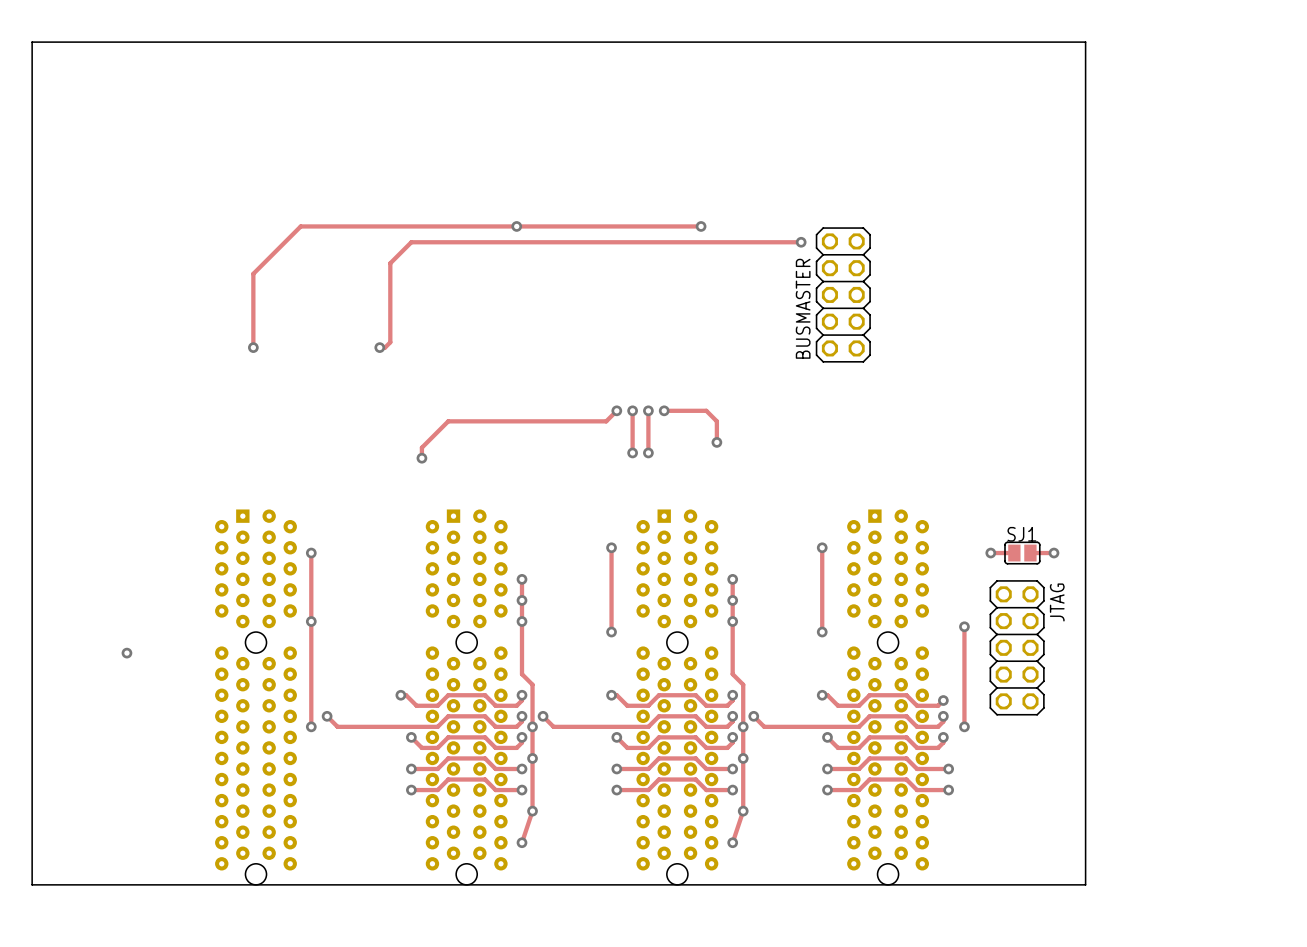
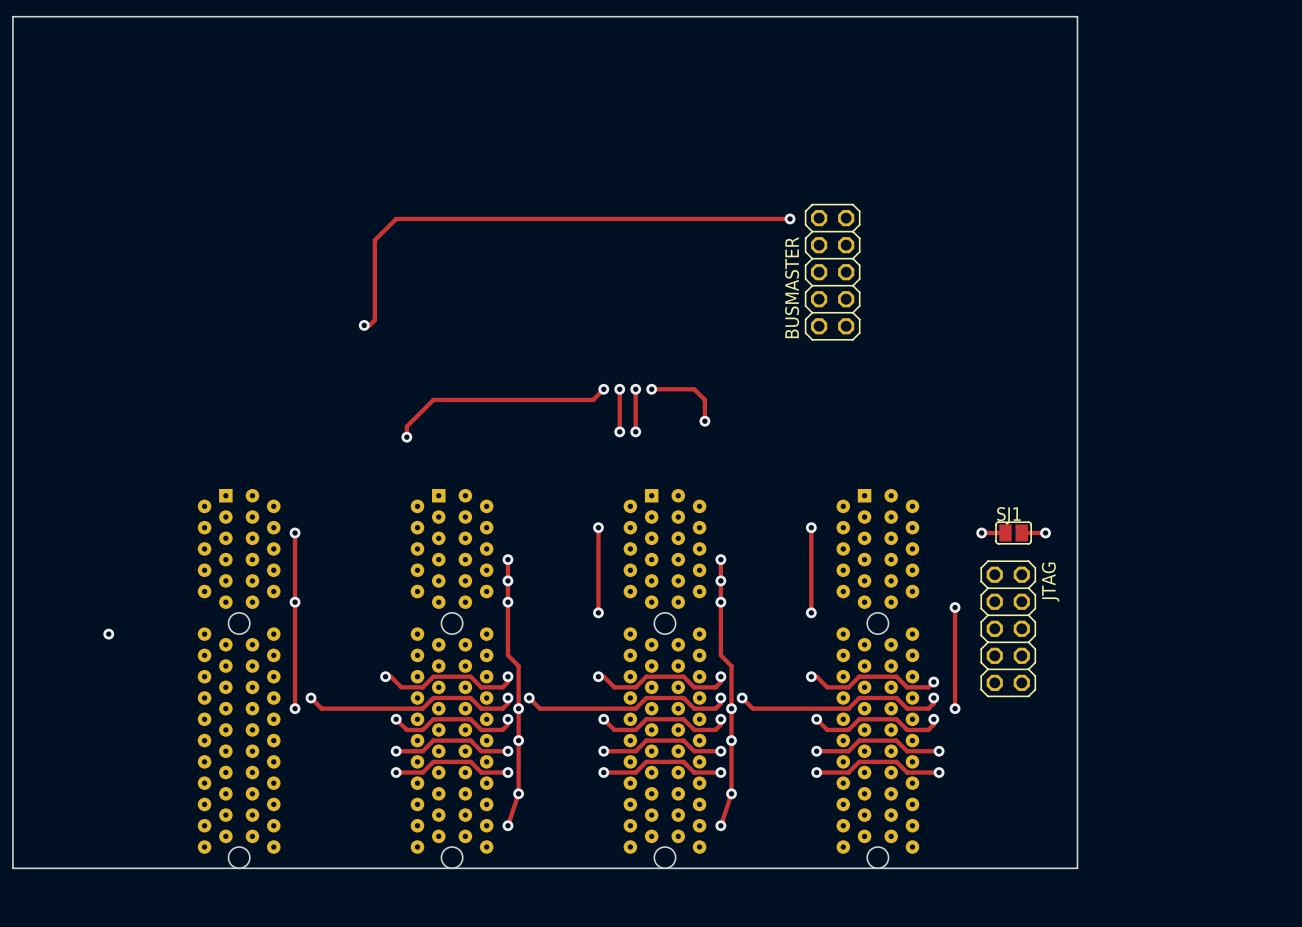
via: (516, 226) -> none
track: (701, 226) (300, 226) (253, 273) (253, 347) -> none
via: (701, 226) -> none
via: (253, 347) -> none

